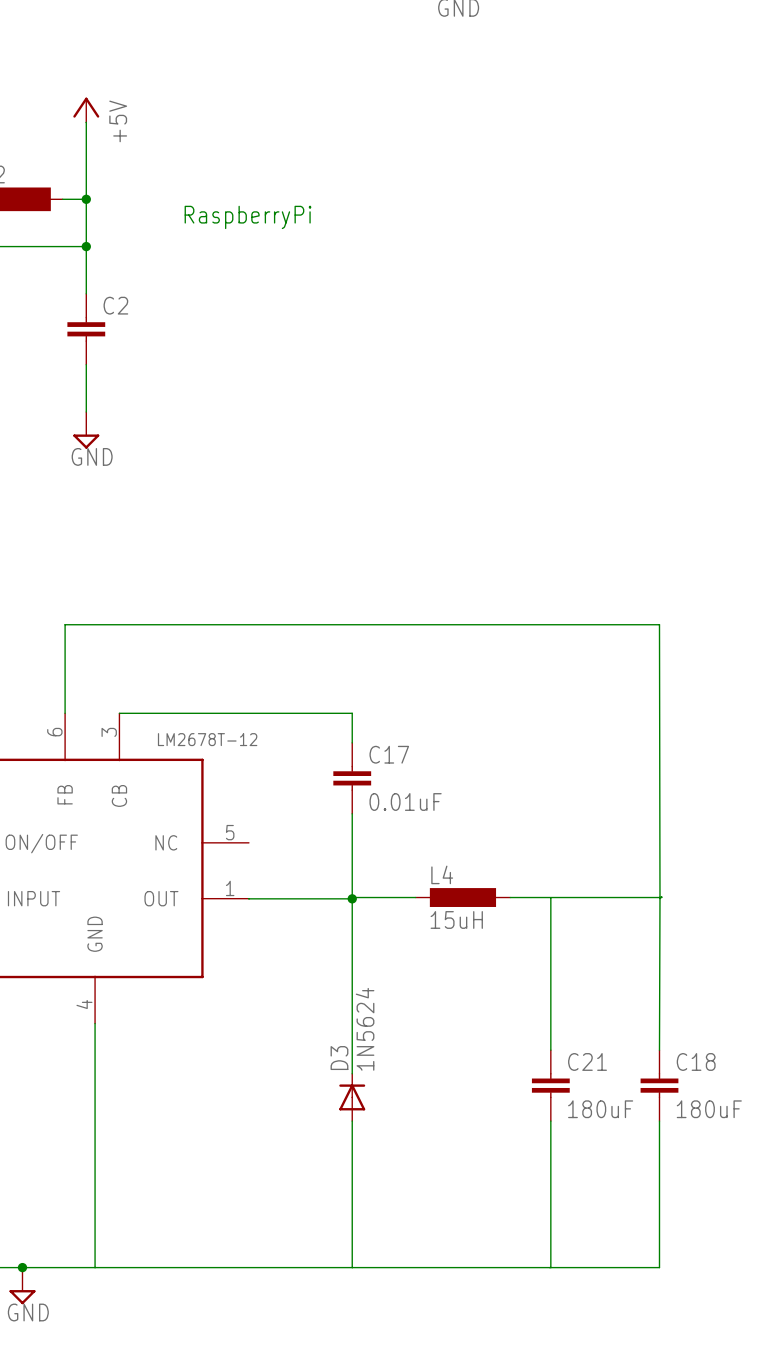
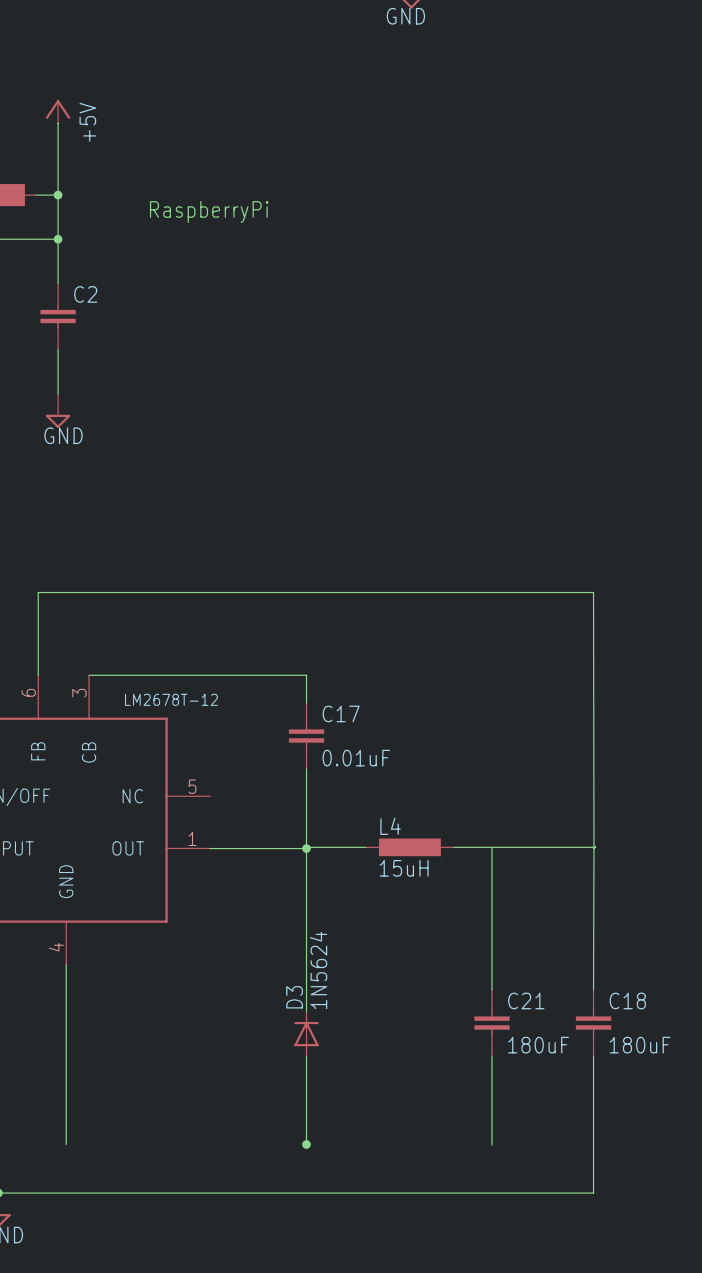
wire: (95, 1215) (95, 1267) -> none
wire: (352, 1215) (352, 1267) -> none
junction: none -> (306, 1144)
wire: (550, 1216) (550, 1267) -> none

